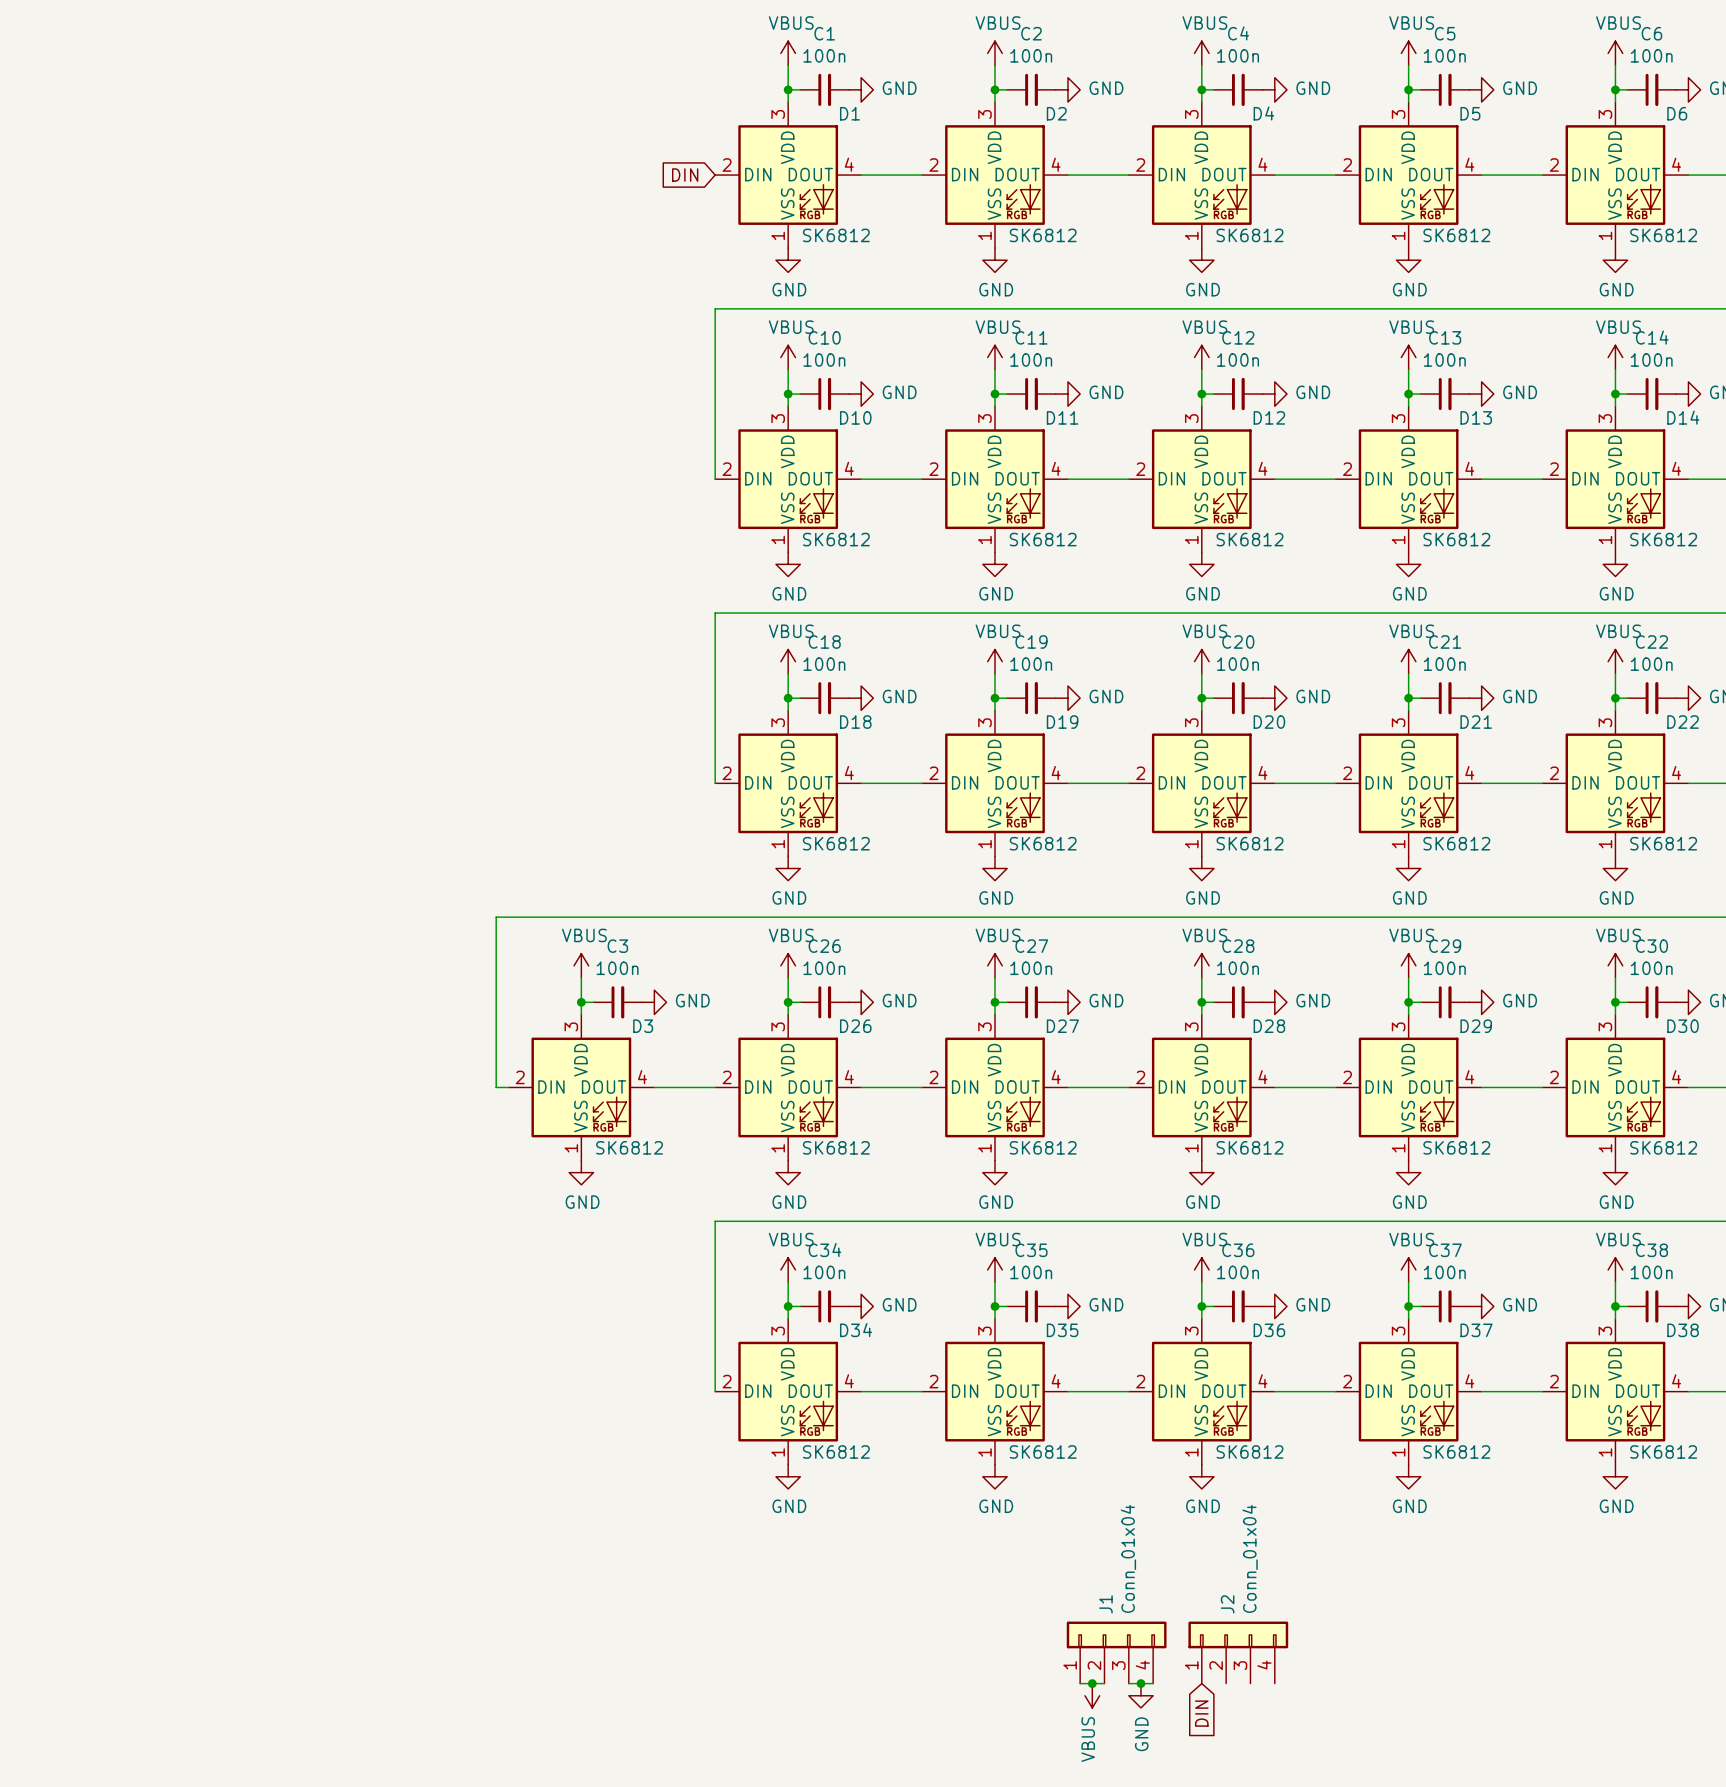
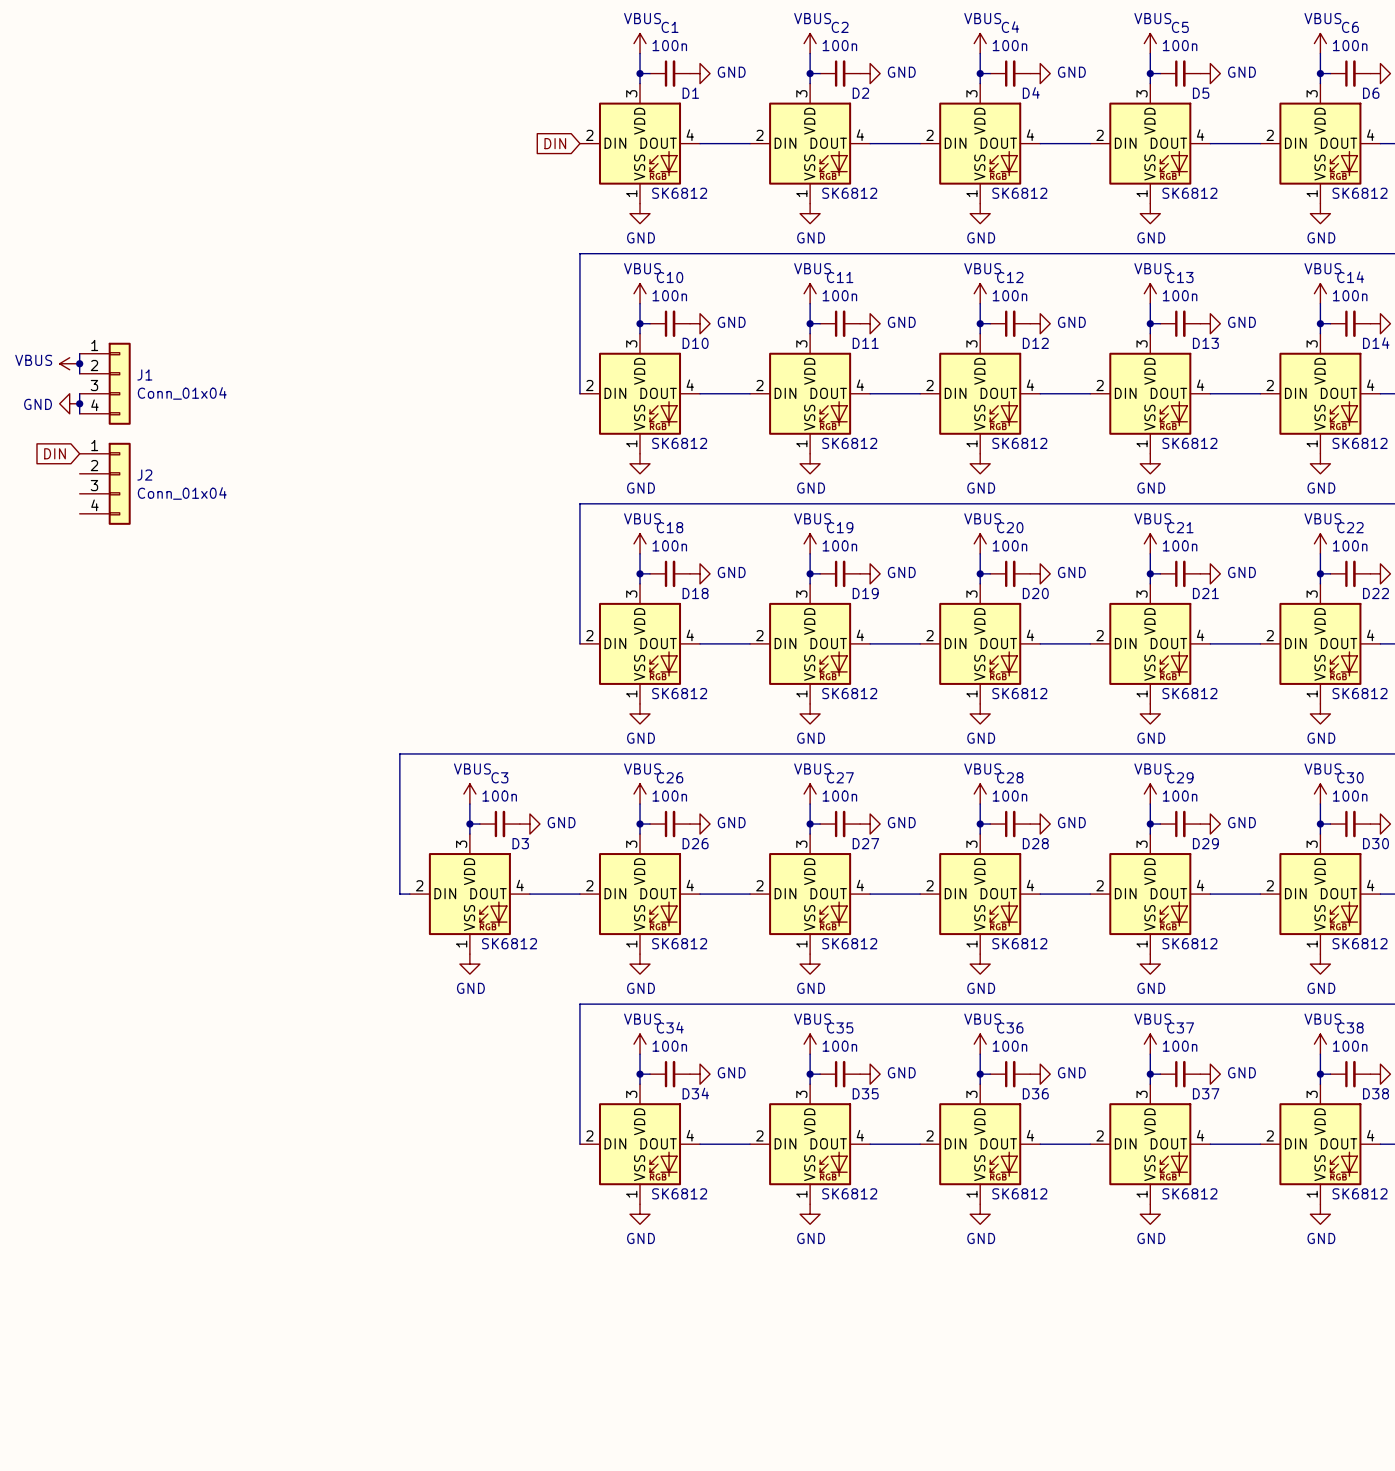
wire: none -> (79, 353) (79, 373)
power symbol: none -> VBUS (69, 363)
junction: none -> (79, 363)
wire: none -> (79, 393) (79, 413)
power symbol: none -> GND (69, 403)
junction: none -> (79, 403)
global label: none -> DIN (55, 453)
J1 rotation: 0° (1116, 1634) -> 90° clockwise (119, 383)
J2 rotation: 0° (1238, 1634) -> 90° clockwise (119, 483)
J1 position: (1116, 1652) -> (105, 383)
J2 position: (1238, 1652) -> (105, 483)
wire: (1080, 1683) (1104, 1683) -> none
junction: (1092, 1683) -> none
wire: (1128, 1683) (1153, 1683) -> none
junction: (1140, 1683) -> none
power symbol: VBUS (1092, 1695) -> none
power symbol: GND (1140, 1695) -> none
global label: DIN (1201, 1713) -> none

